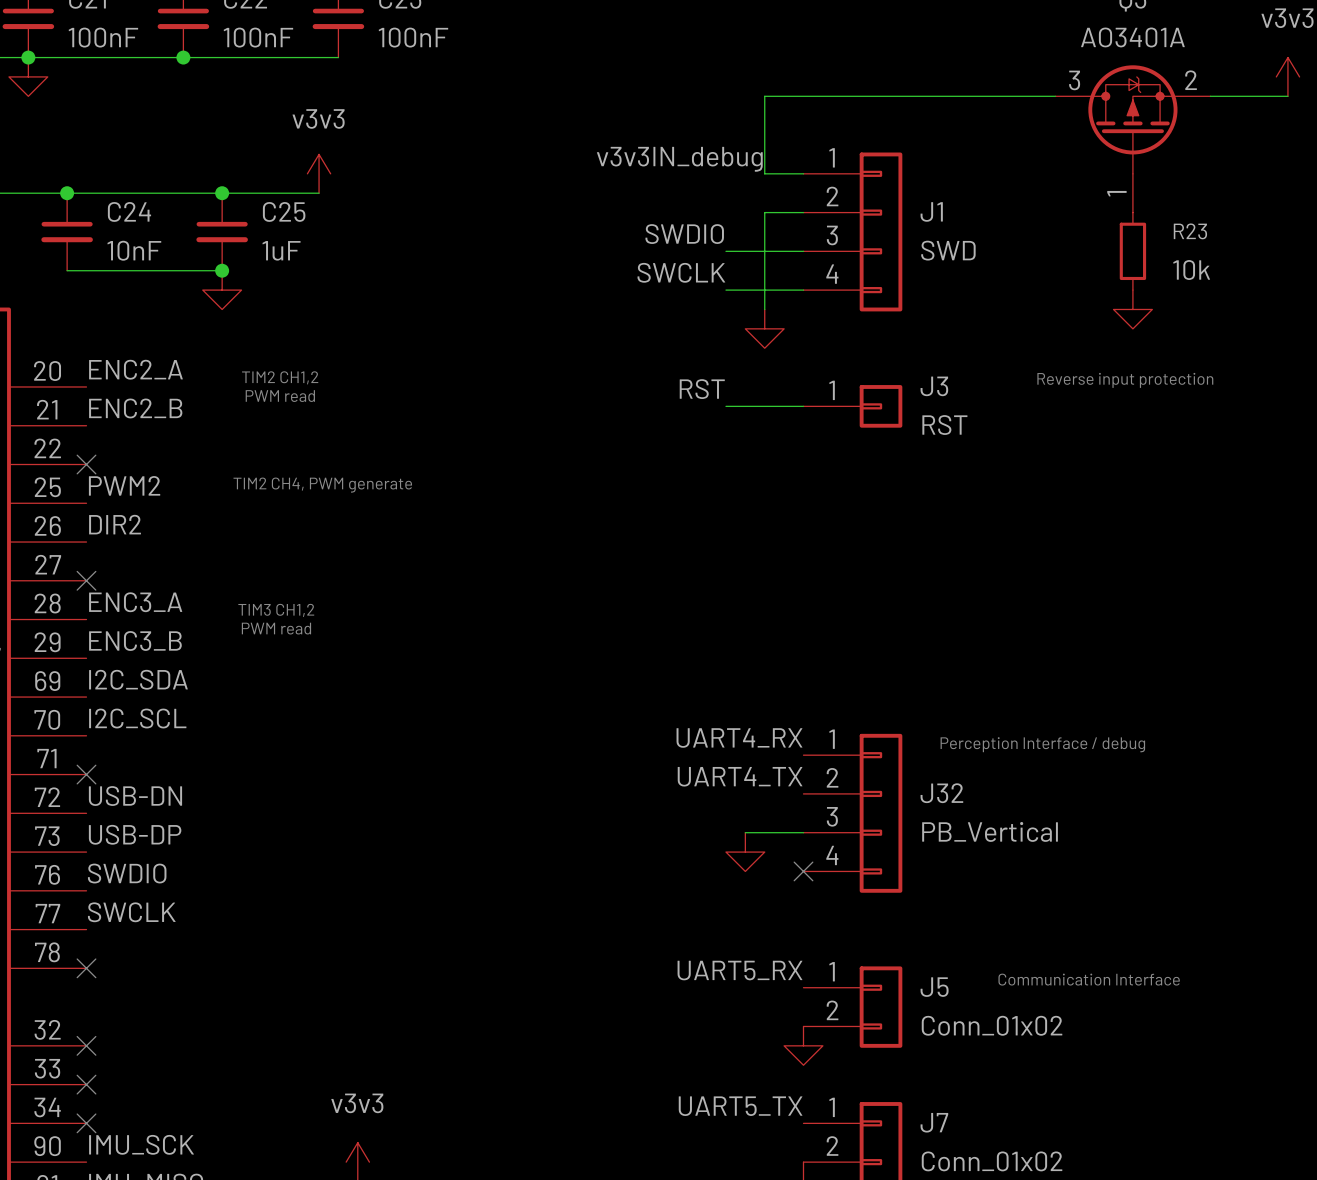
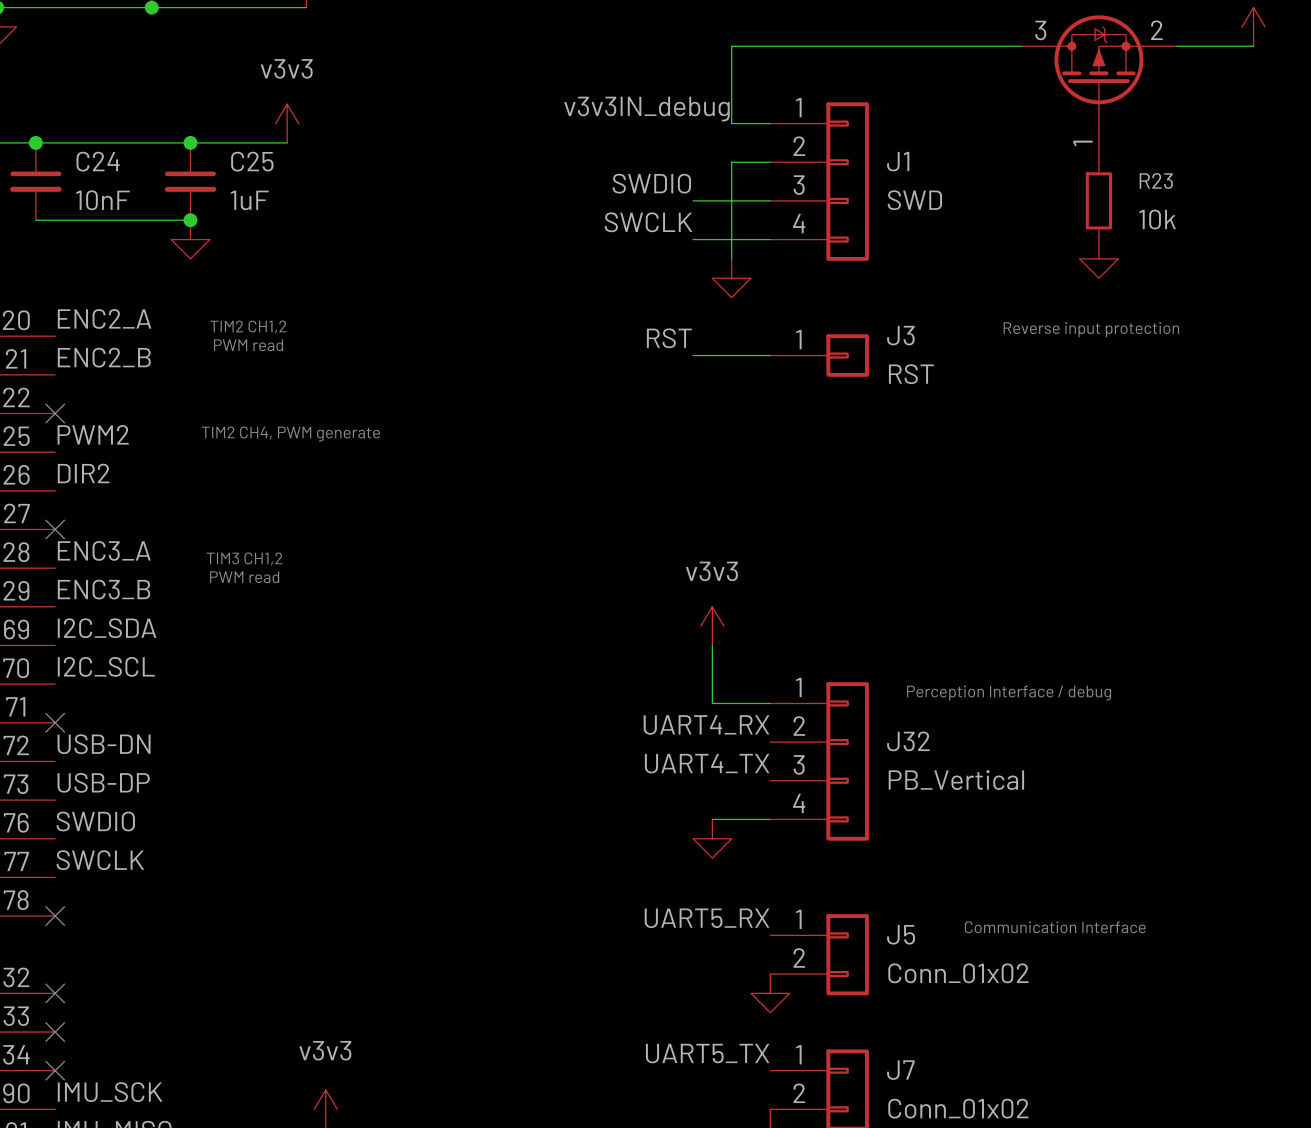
power symbol: none -> v3v3 (712, 626)
wire: none -> (712, 645) (712, 703) (770, 703)
label: UART4_RX (739, 737) -> none
label: UART4_TX (740, 776) -> UART4_RX (706, 724)
label: none -> UART4_TX (707, 763)
wire: (745, 832) (803, 832) -> (712, 819) (770, 819)
power symbol position: (745, 852) -> (712, 838)
no-connect mark: (803, 871) -> none

